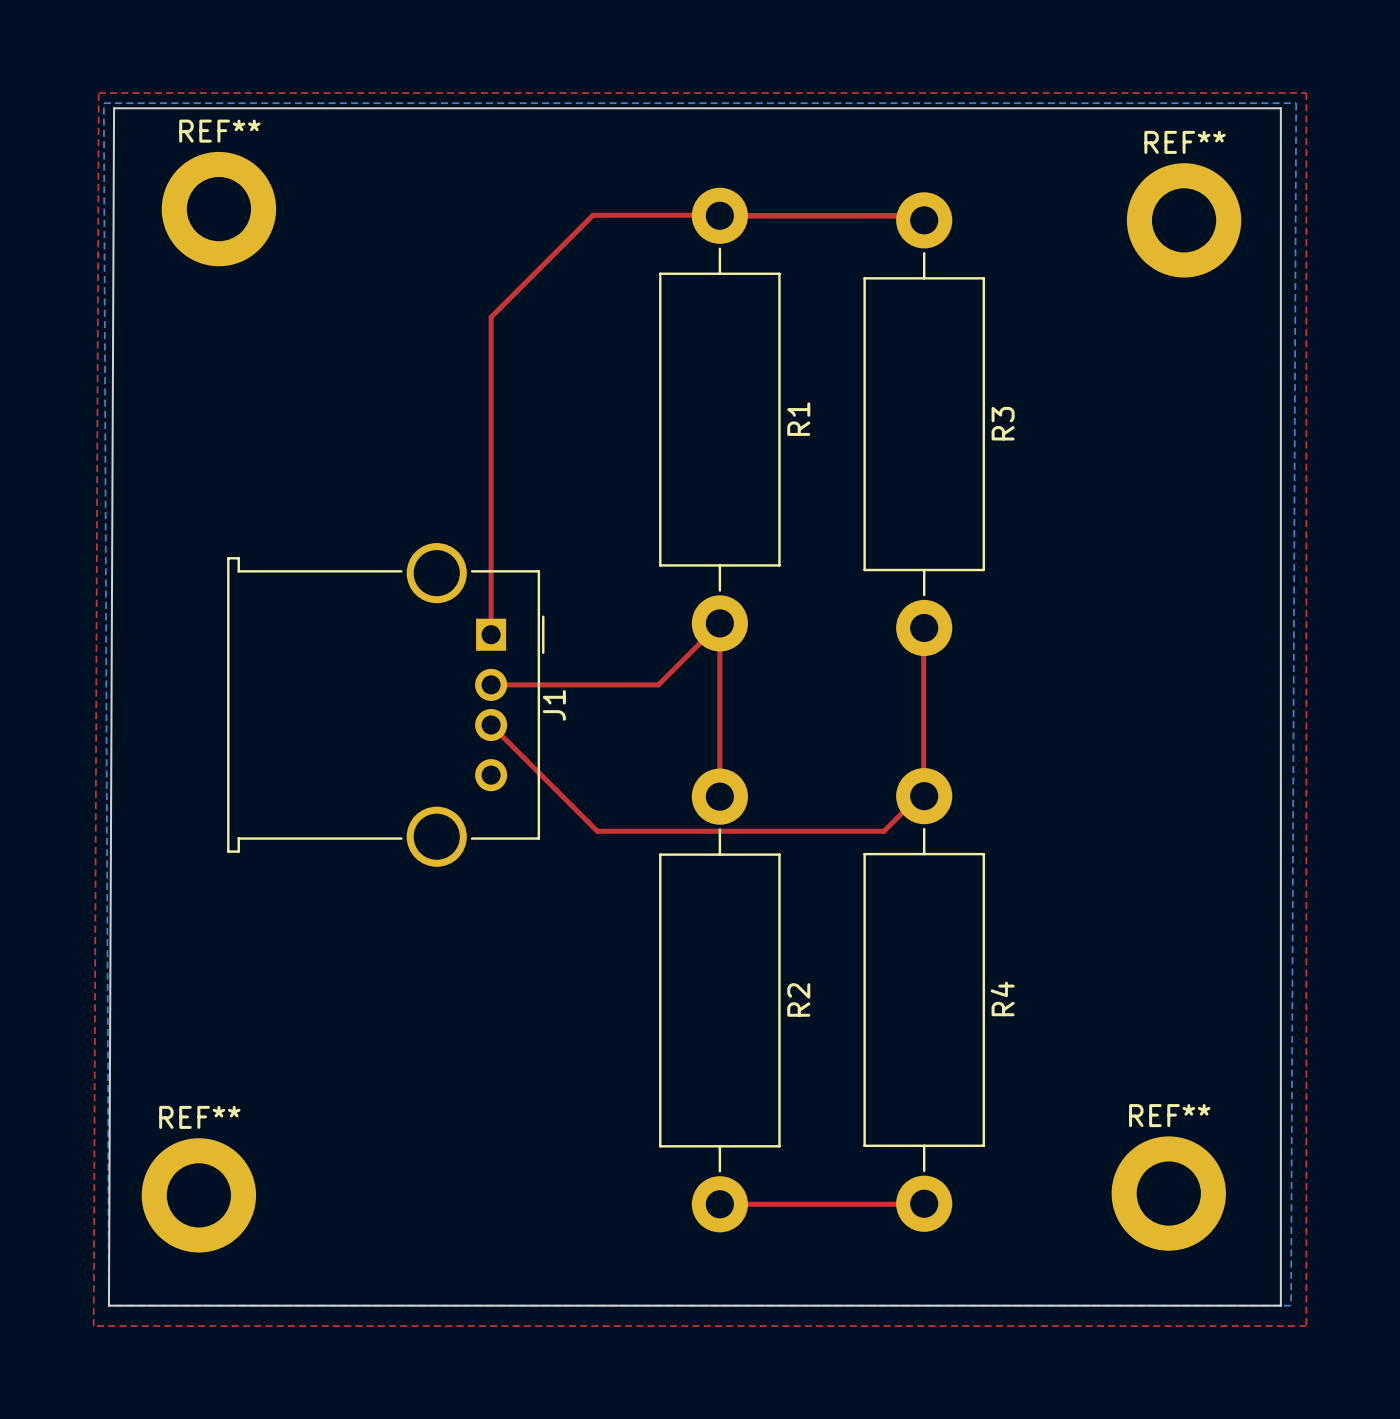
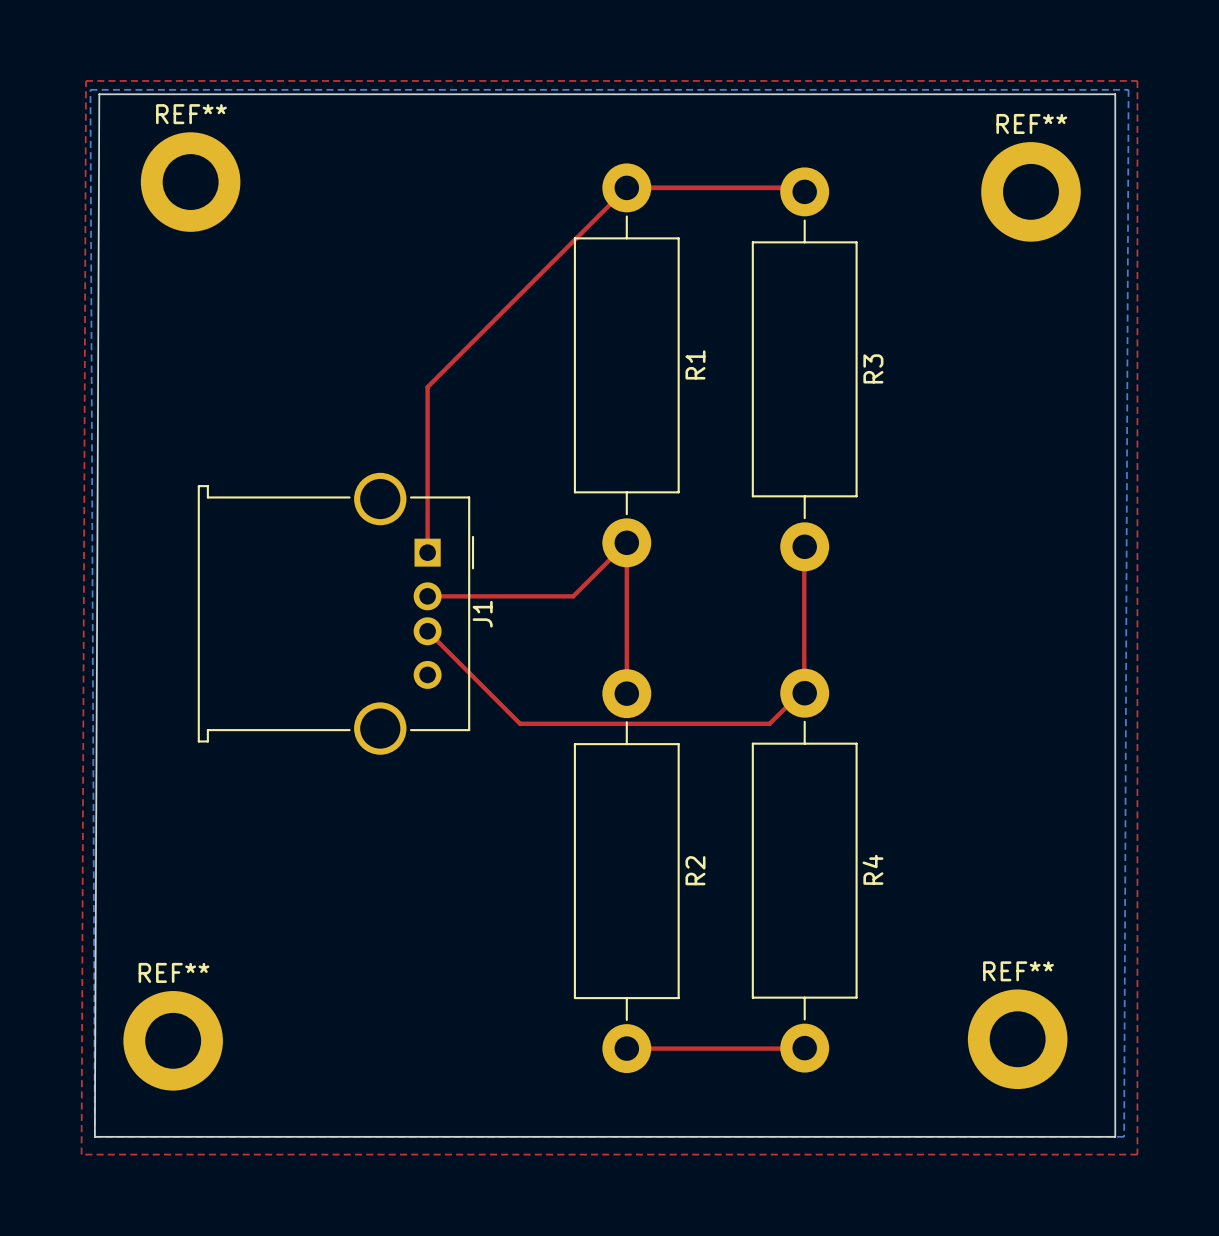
top track: (719, 215) (593, 215) (491, 317) (491, 444) -> (626, 187) (427, 387)

